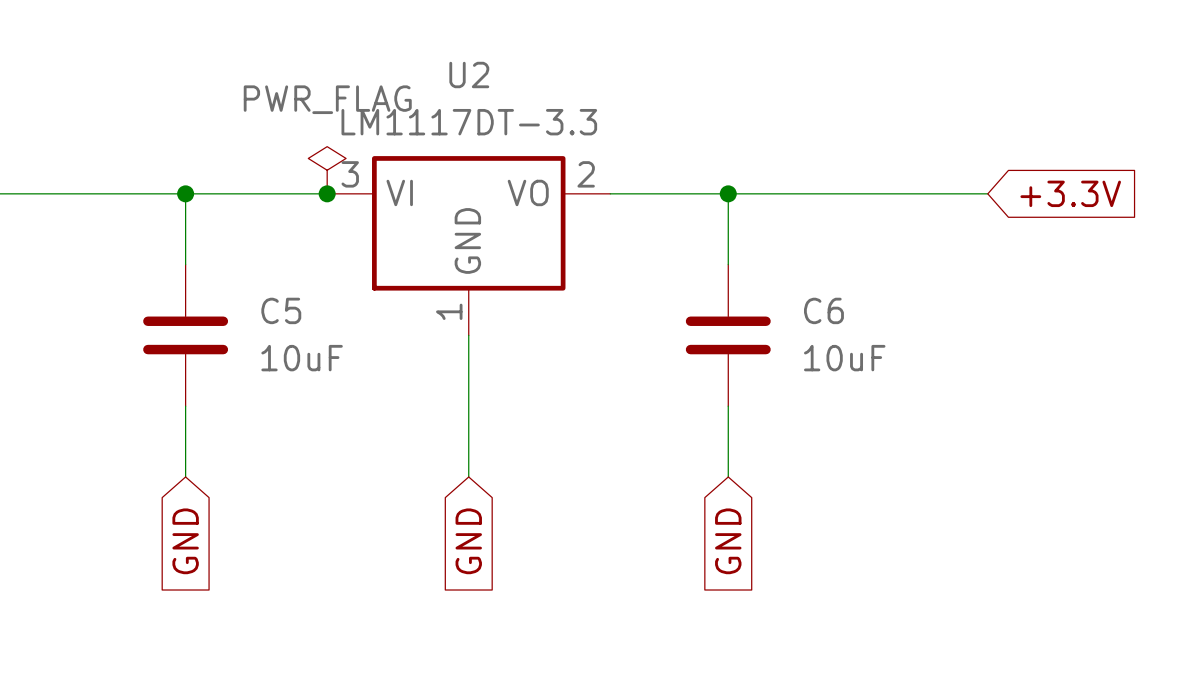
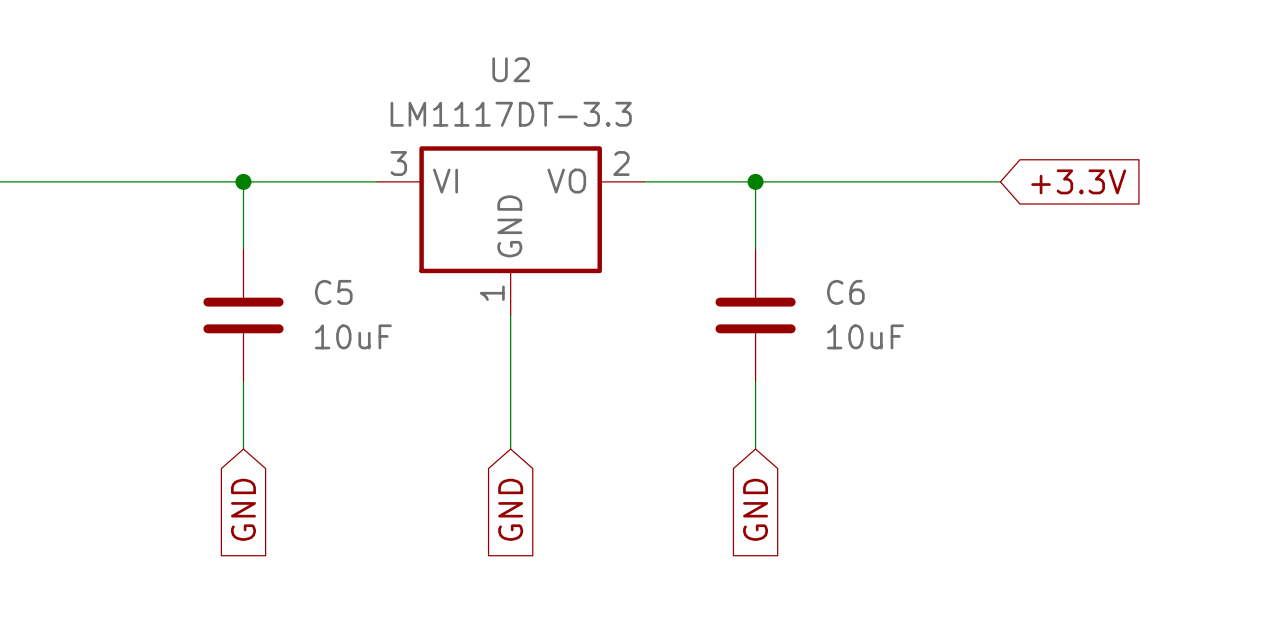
power symbol: PWR_FLAG (327, 170) -> none
junction: (327, 193) -> none

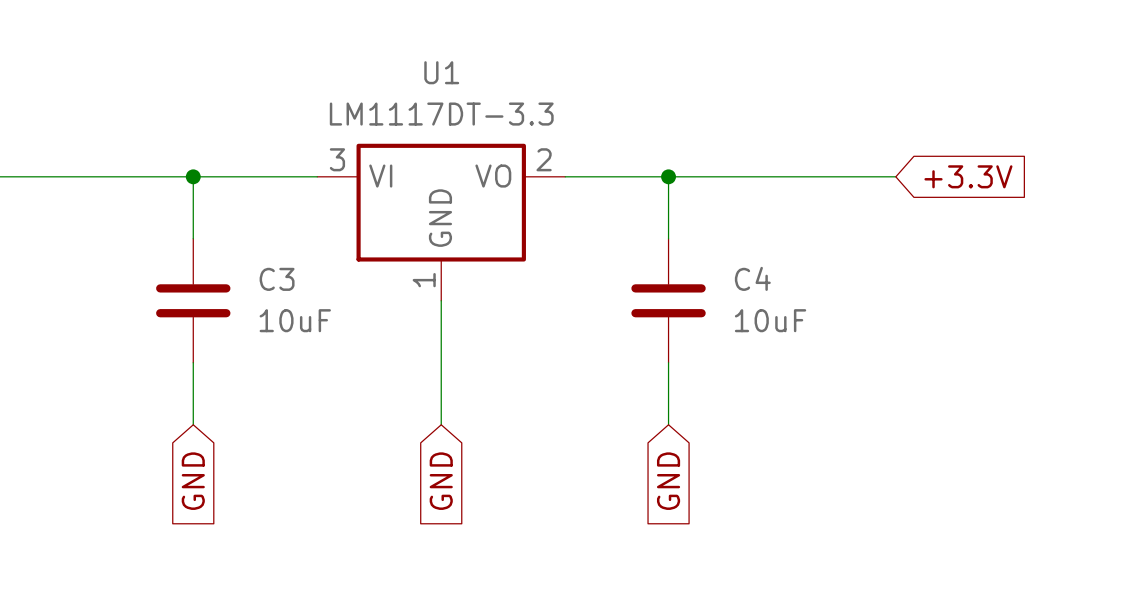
U2 name: U2 (511, 69) -> U1 (441, 72)
C5 name: C5 (333, 292) -> C3 (277, 279)
C6 name: C6 (845, 292) -> C4 (752, 278)

